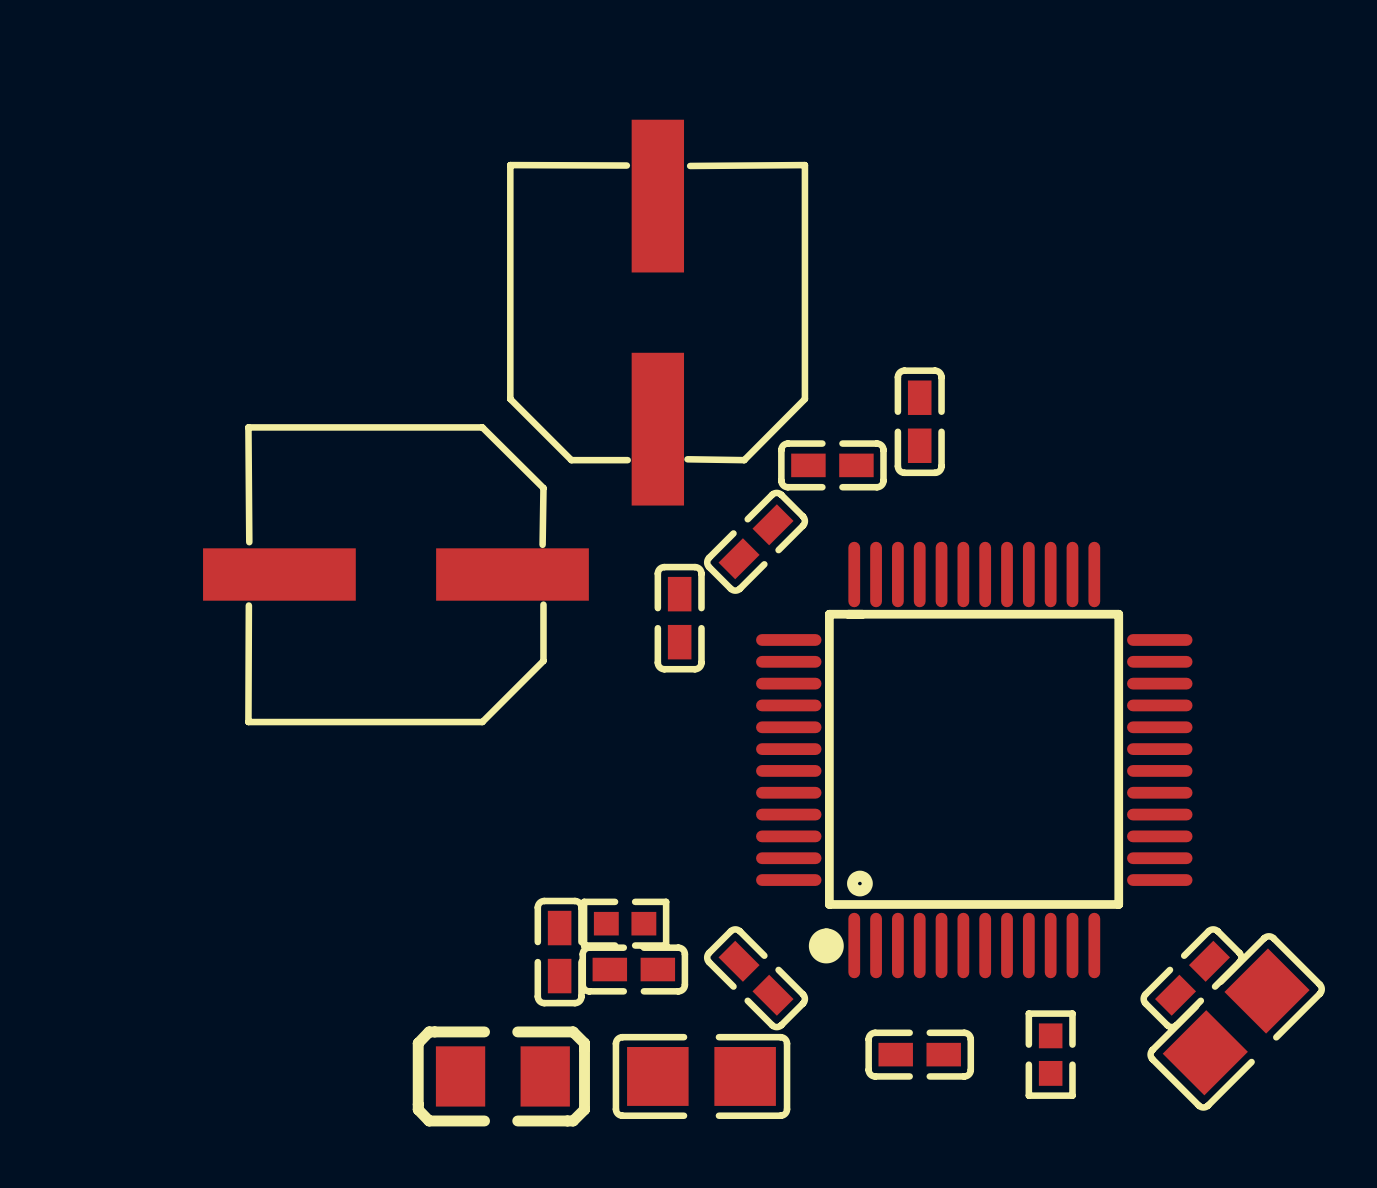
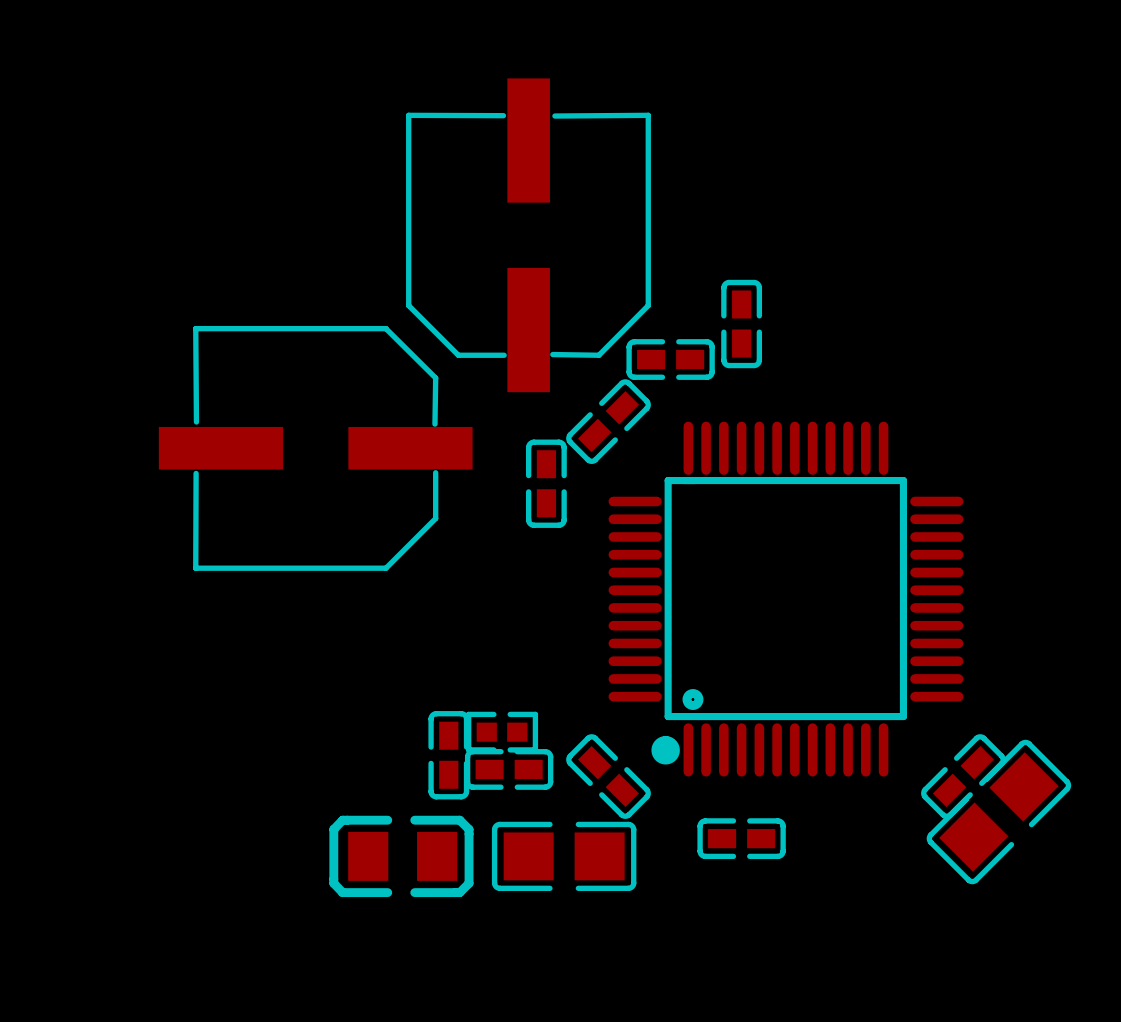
part: (1050, 1054) -> none

